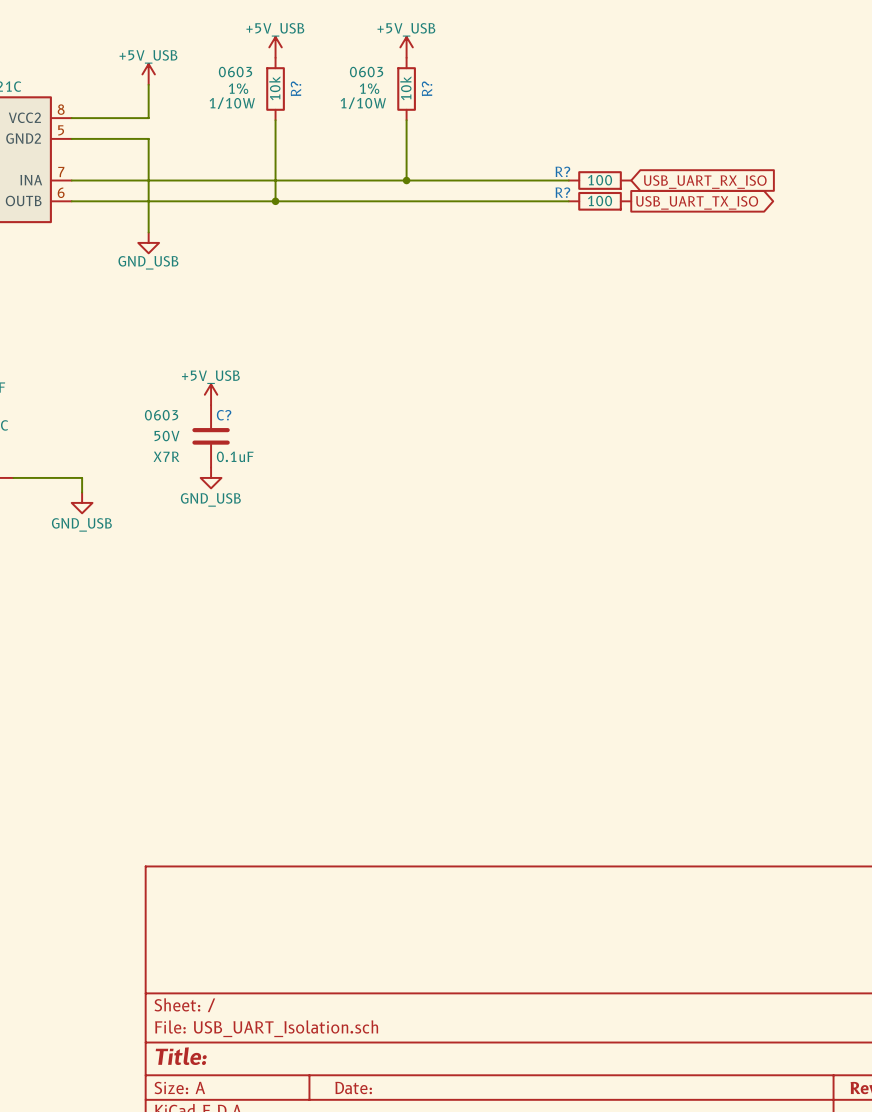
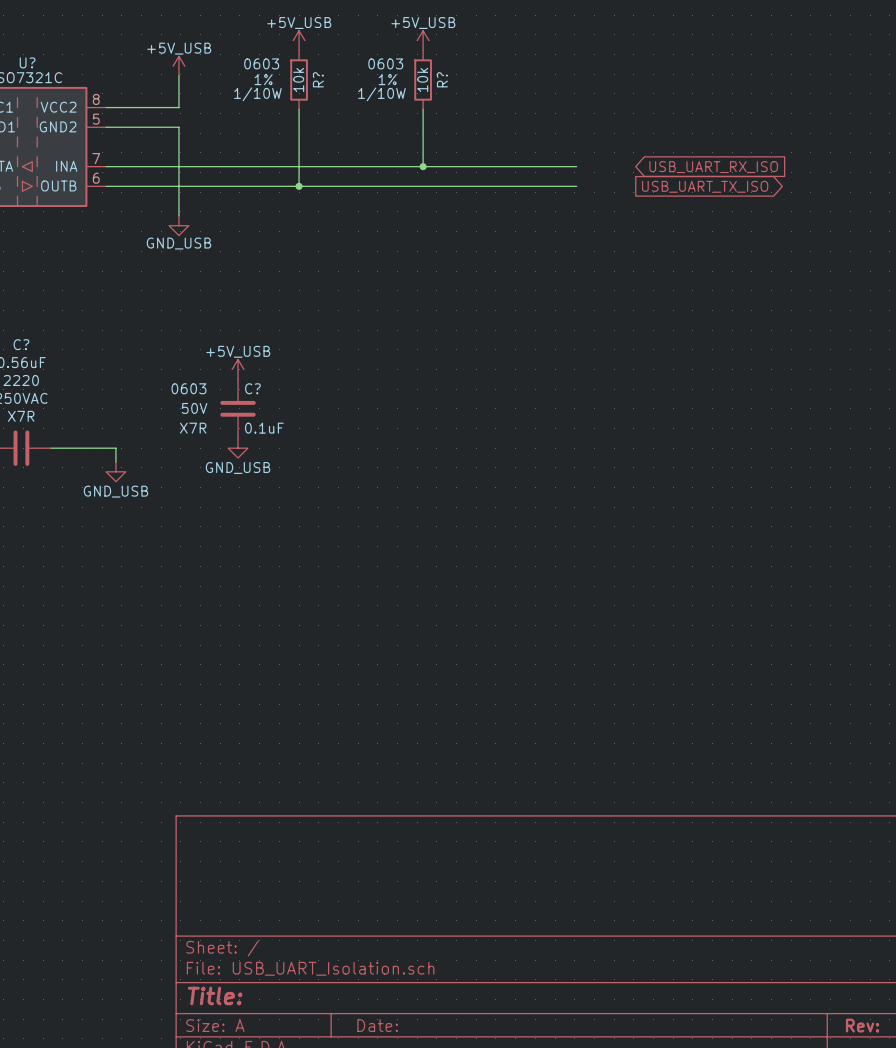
R?: 100 (600, 180) -> none
R?: 100 (600, 201) -> none

